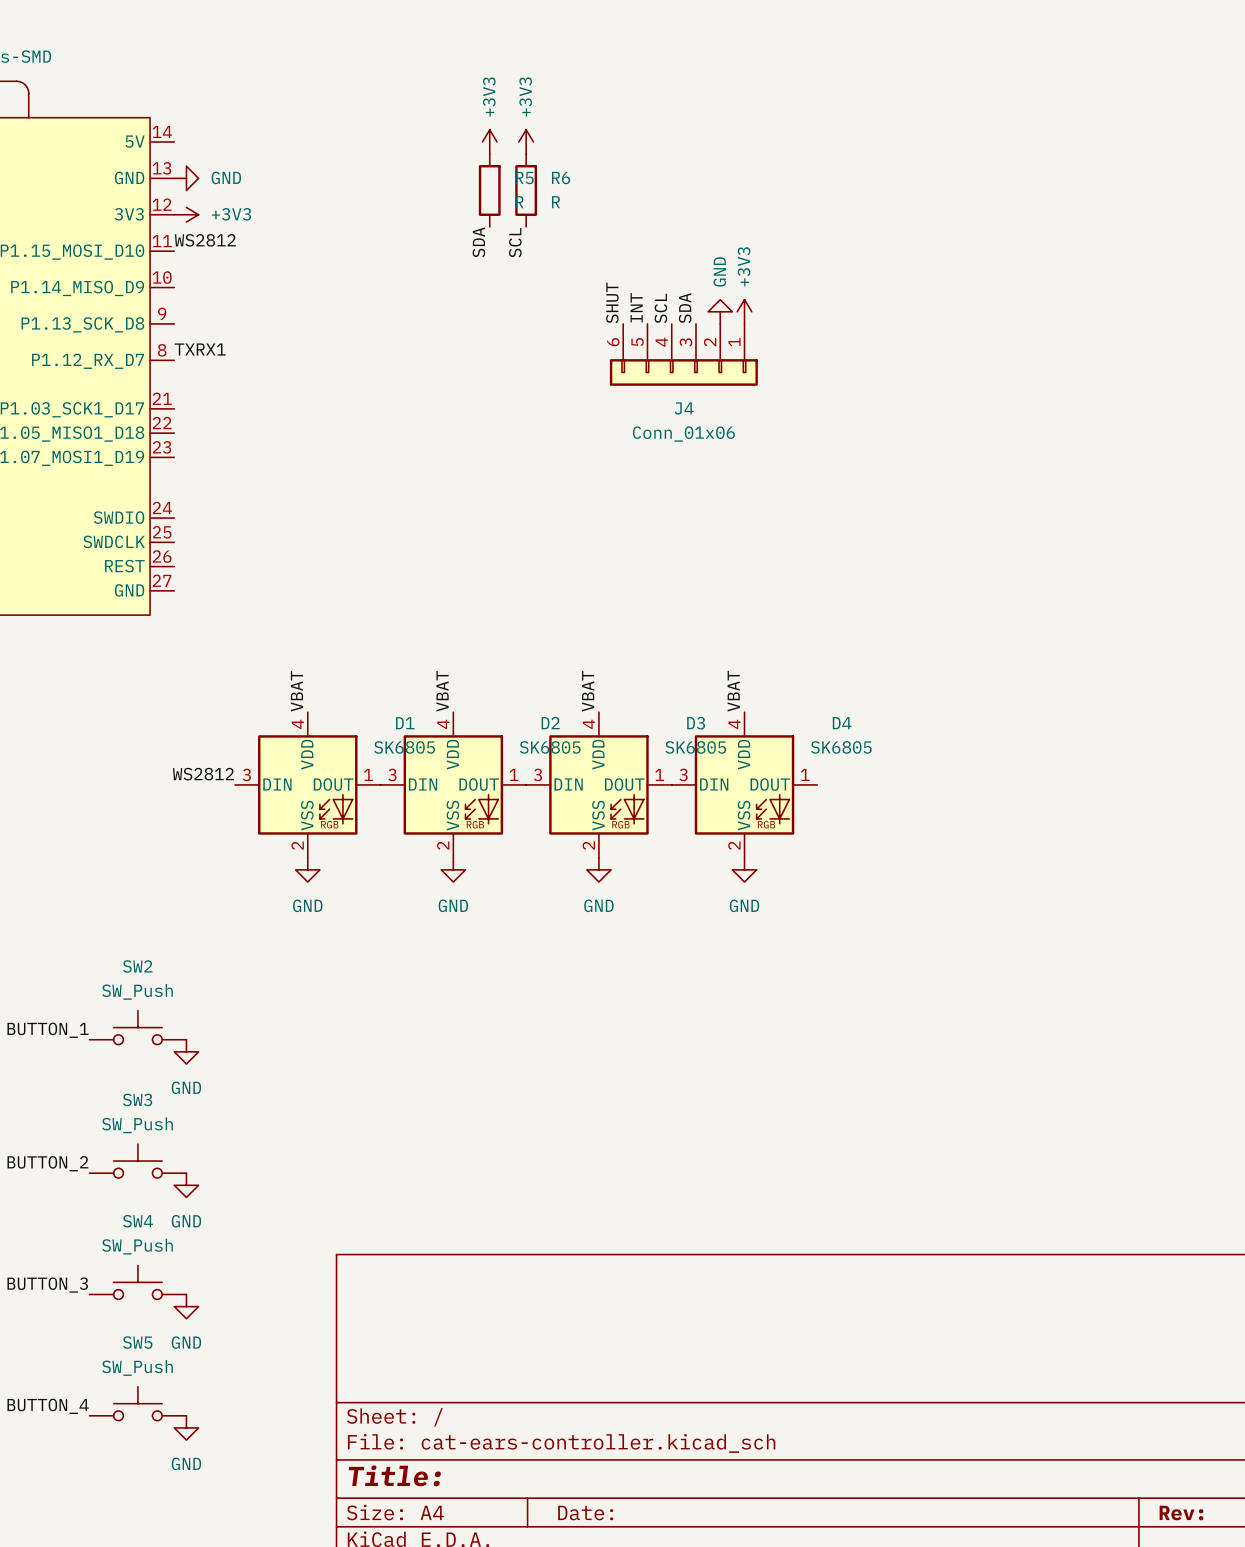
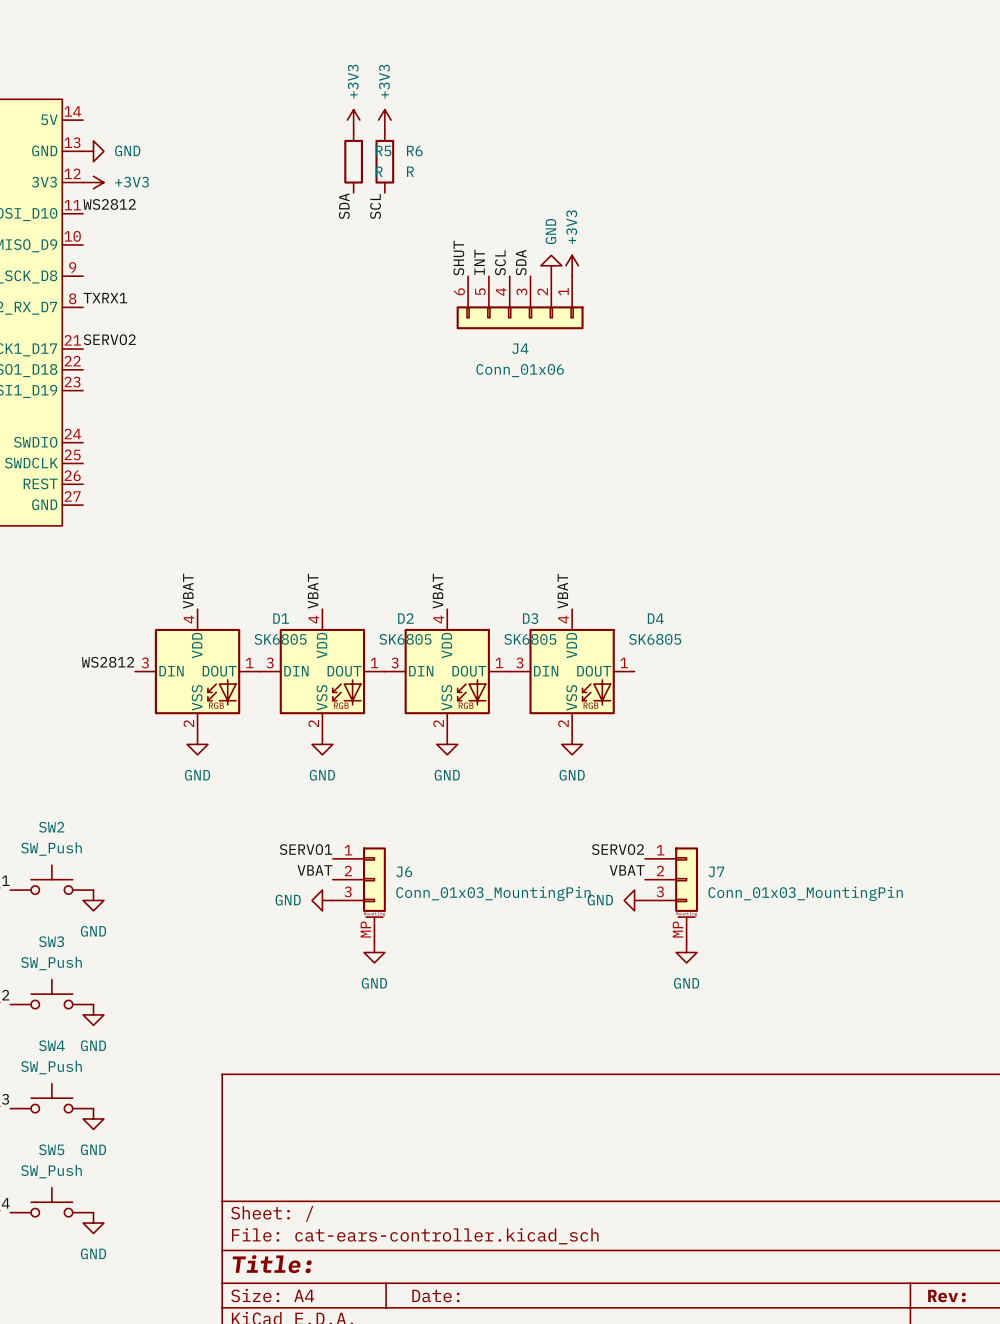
label: none -> SERVO2 (109, 339)
label: none -> SERVO1 (305, 849)
label: none -> SERVO2 (618, 849)
label: none -> VBAT (315, 870)
label: none -> VBAT (627, 870)
J6: none -> Conn_01x03_MountingPin (359, 894)
J7: none -> Conn_01x03_MountingPin (671, 894)
power symbol: none -> GND (322, 900)
power symbol: none -> GND (634, 900)
power symbol: none -> GND (374, 952)
power symbol: none -> GND (686, 952)

